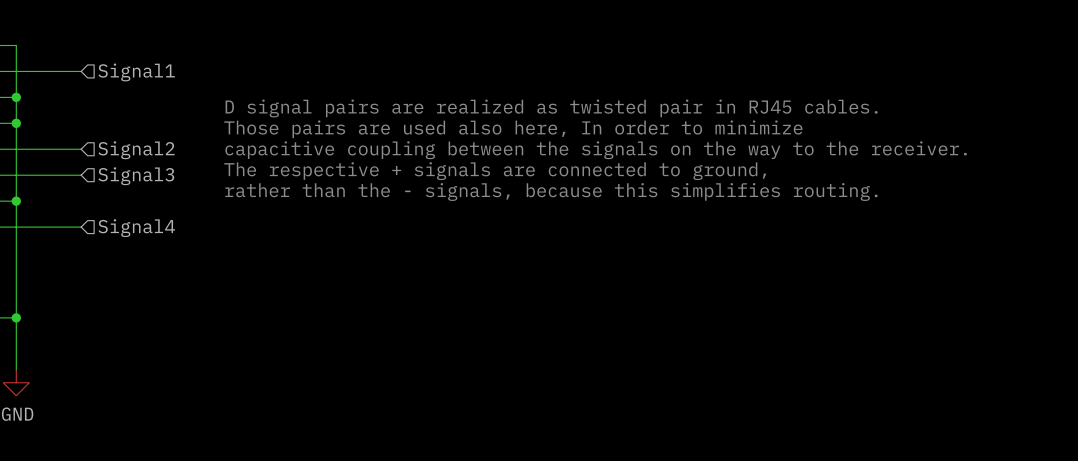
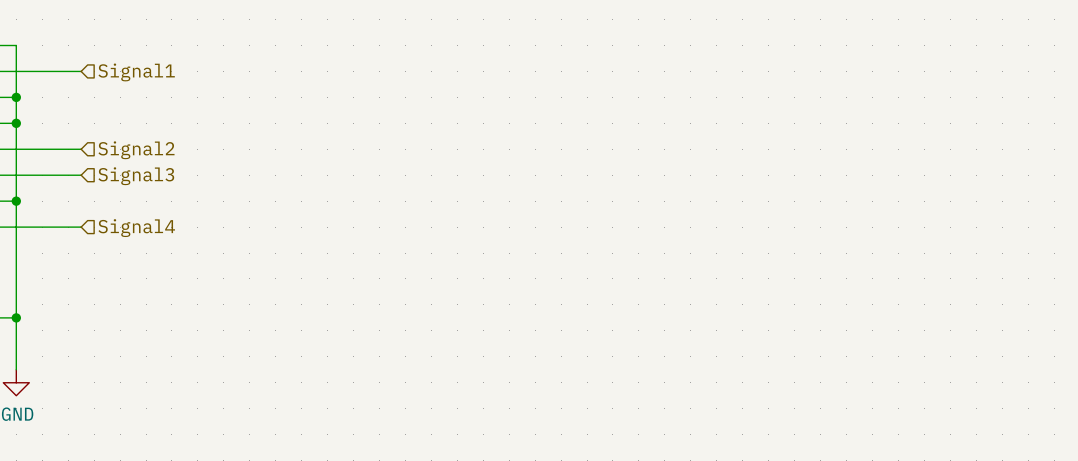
text: D signal pairs are realized as twisted pair in RJ45 cables. (551, 108) -> none
text: Those pairs are used also here, In order to minimize (513, 129) -> none
text: capacitive coupling between the signals on the way to the receiver. (596, 150) -> none
text: The respective + signals are connected to ground, (495, 171) -> none
text: rather than the - signals, because this simplifies routing. (551, 192) -> none

